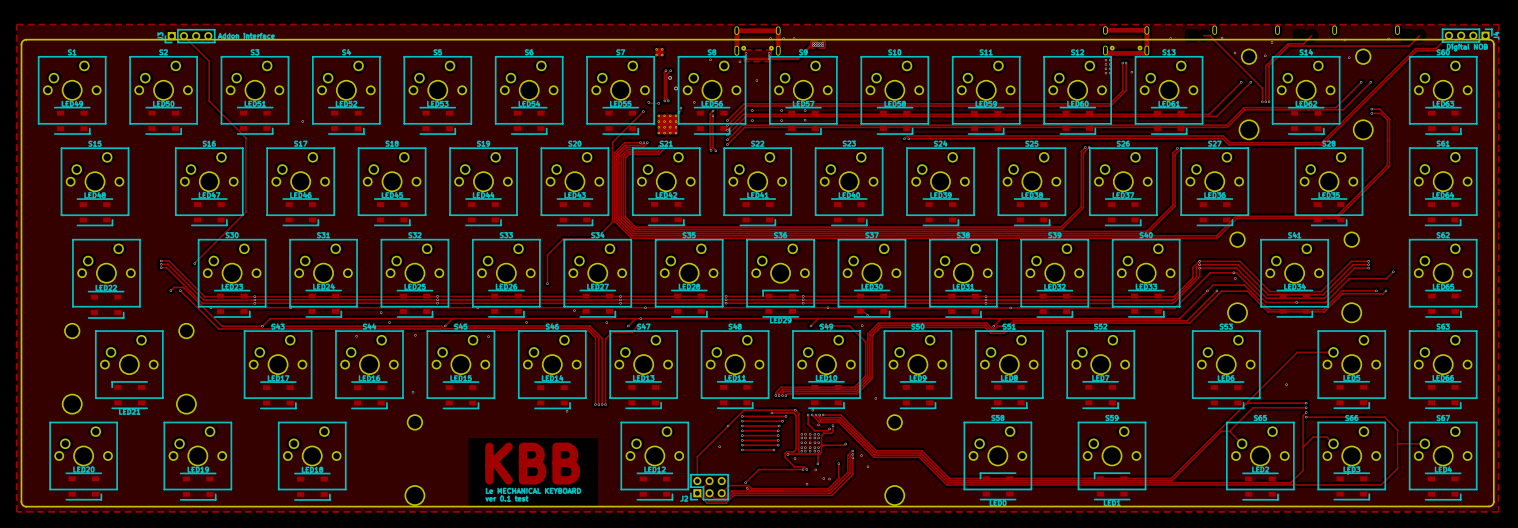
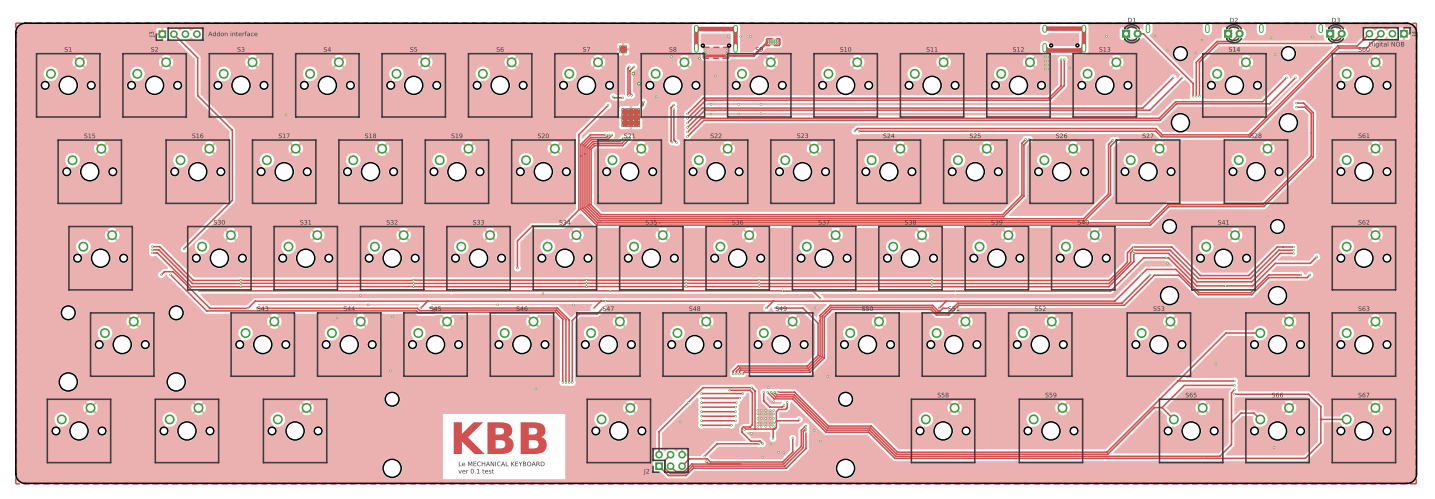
part: none -> (1131, 33)
part: none -> (1233, 33)
part: none -> (1335, 33)
board edge: (1489, 39) (24, 39) (21, 44) (21, 503) (26, 506) (1490, 506) (1493, 501) (1493, 44) (1489, 39) -> (25, 23) (18, 25) (15, 32) (15, 474) (17, 479) (22, 482) (1407, 483) (1412, 481) (1416, 477) (1416, 32) (1414, 26) (1409, 23) (25, 23)
part: (72, 120) -> none
part: (163, 120) -> none
part: (255, 120) -> none
part: (346, 120) -> none
part: (437, 120) -> none
part: (529, 120) -> none
part: (620, 120) -> none
part: (712, 120) -> none
part: (803, 120) -> none
part: (895, 120) -> none
part: (986, 120) -> none
part: (1077, 120) -> none
part: (1169, 120) -> none
part: (1306, 120) -> none
part: (1443, 120) -> none
part: (94, 212) -> none
part: (209, 212) -> none
part: (300, 212) -> none
part: (392, 212) -> none
part: (483, 212) -> none
part: (574, 212) -> none
part: (666, 212) -> none
part: (757, 212) -> none
part: (849, 212) -> none
part: (940, 212) -> none
part: (1032, 212) -> none
part: (1123, 212) -> none
part: (1214, 212) -> none
part: (1329, 212) -> none
part: (1443, 212) -> none
part: (232, 303) -> none
part: (323, 303) -> none
part: (415, 303) -> none
part: (506, 303) -> none
part: (597, 303) -> none
part: (689, 303) -> none
part: (780, 303) -> none
part: (872, 303) -> none
part: (963, 303) -> none
part: (1054, 303) -> none
part: (1146, 303) -> none
part: (1294, 303) -> none
part: (1443, 303) -> none
part: (106, 304) -> none
part: (1009, 394) -> none
part: (1351, 394) -> none
part: (129, 395) -> none
part: (278, 395) -> none
part: (369, 395) -> none
part: (460, 395) -> none
part: (552, 395) -> none
part: (643, 395) -> none
part: (735, 395) -> none
part: (826, 395) -> none
part: (917, 395) -> none
part: (1100, 395) -> none
part: (1226, 395) -> none
part: (1443, 395) -> none
part: (83, 486) -> none
part: (198, 486) -> none
part: (312, 486) -> none
part: (654, 486) -> none
part: (998, 486) -> none
part: (1112, 486) -> none
part: (1260, 486) -> none
part: (1351, 486) -> none
part: (1443, 486) -> none

